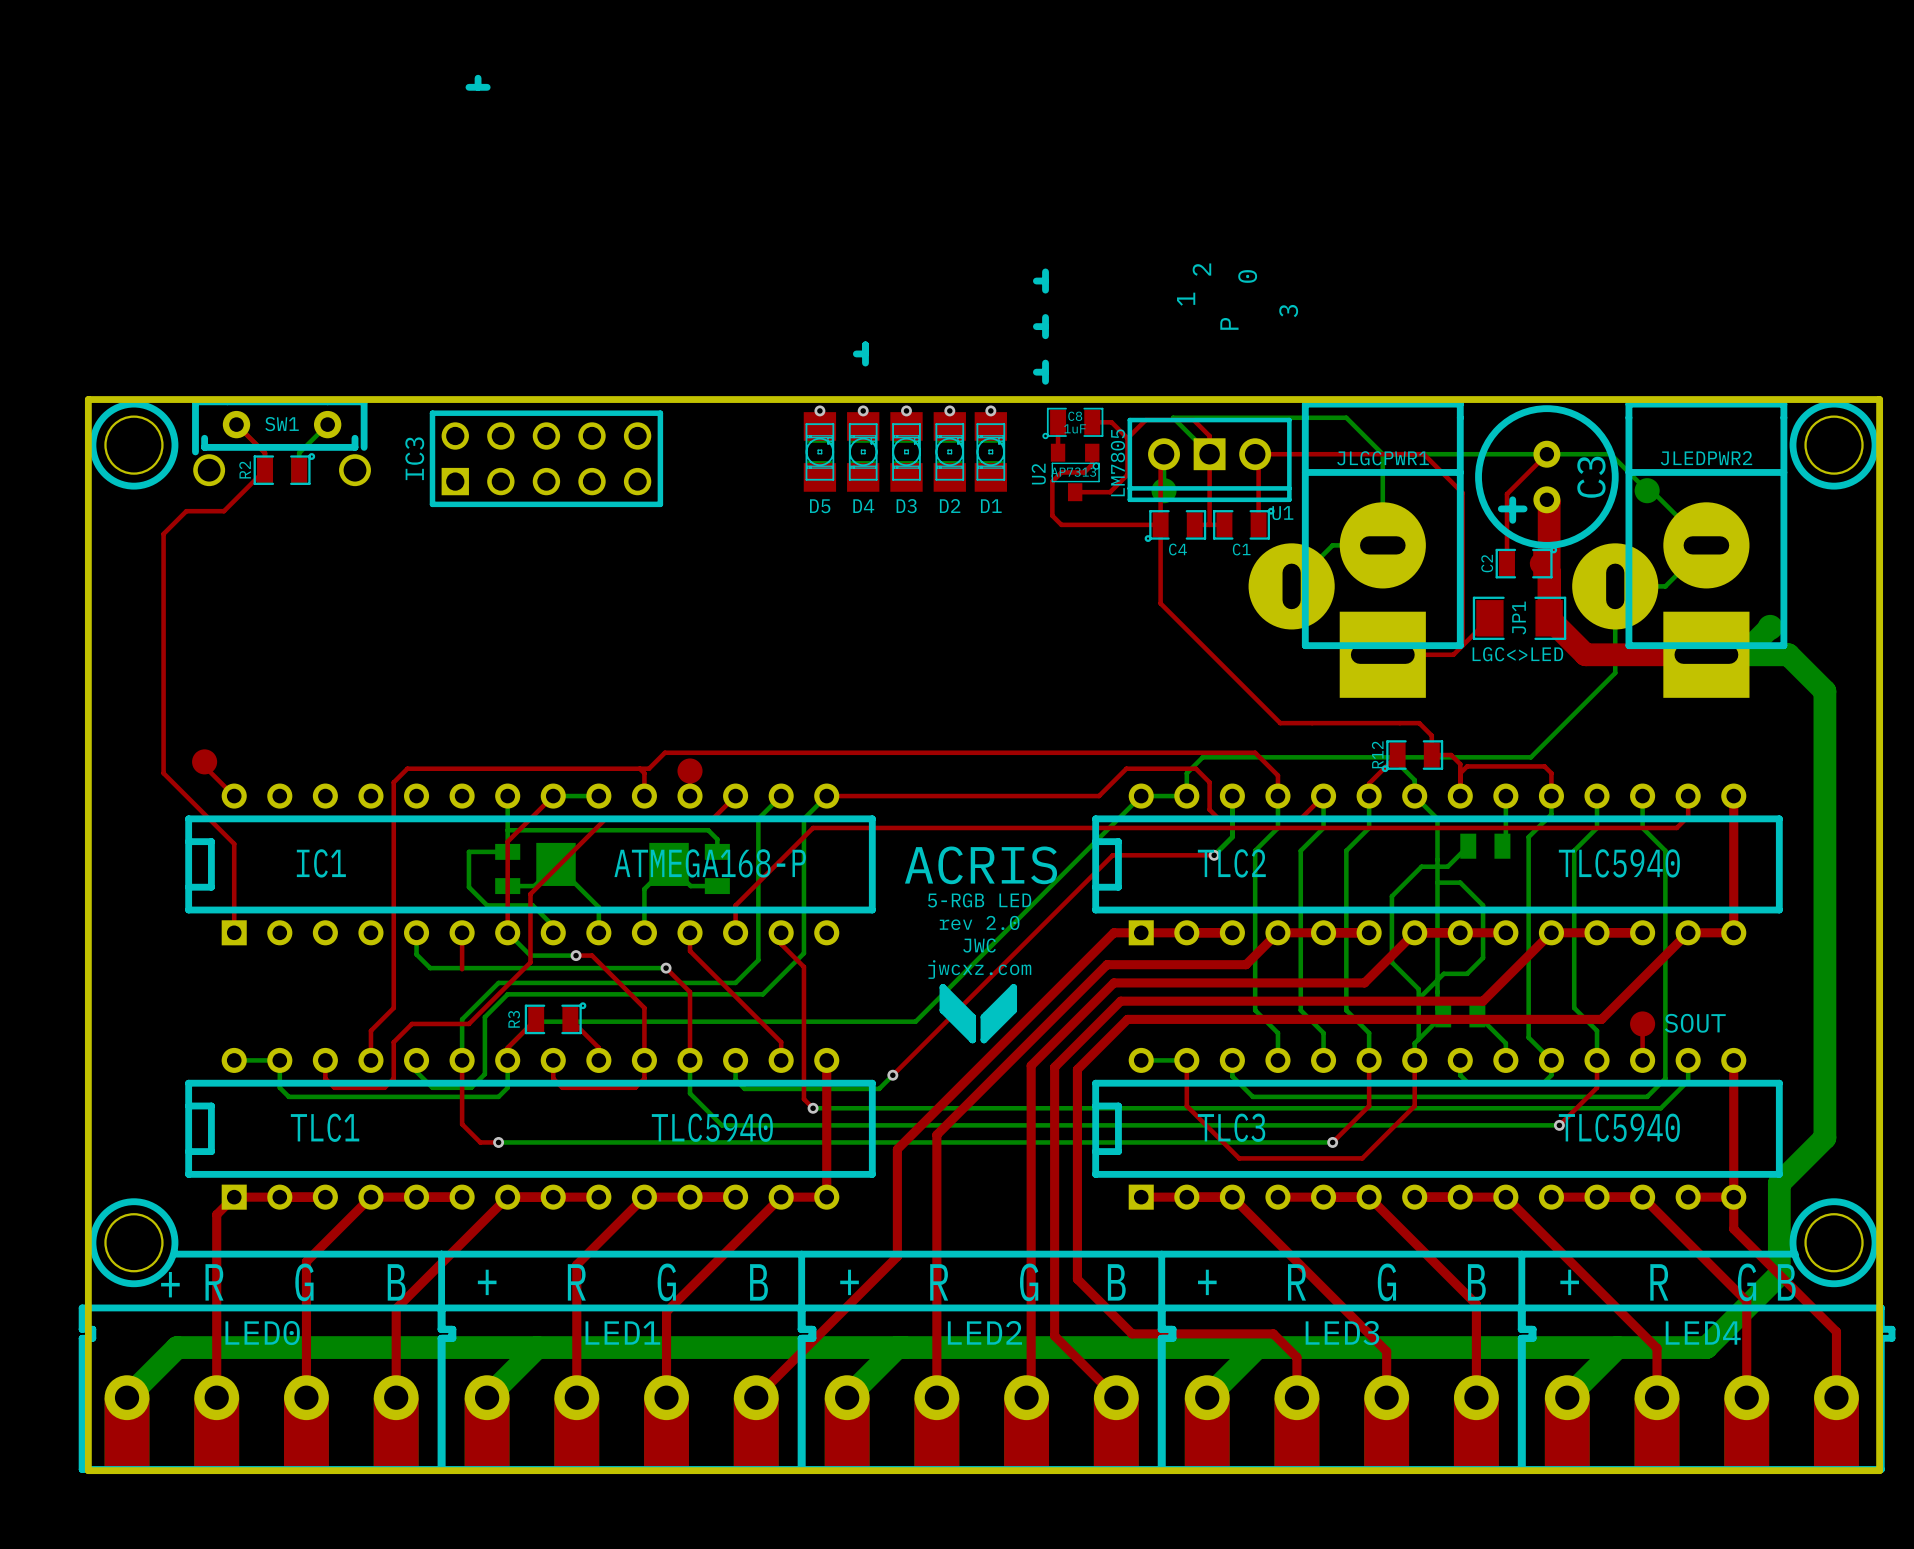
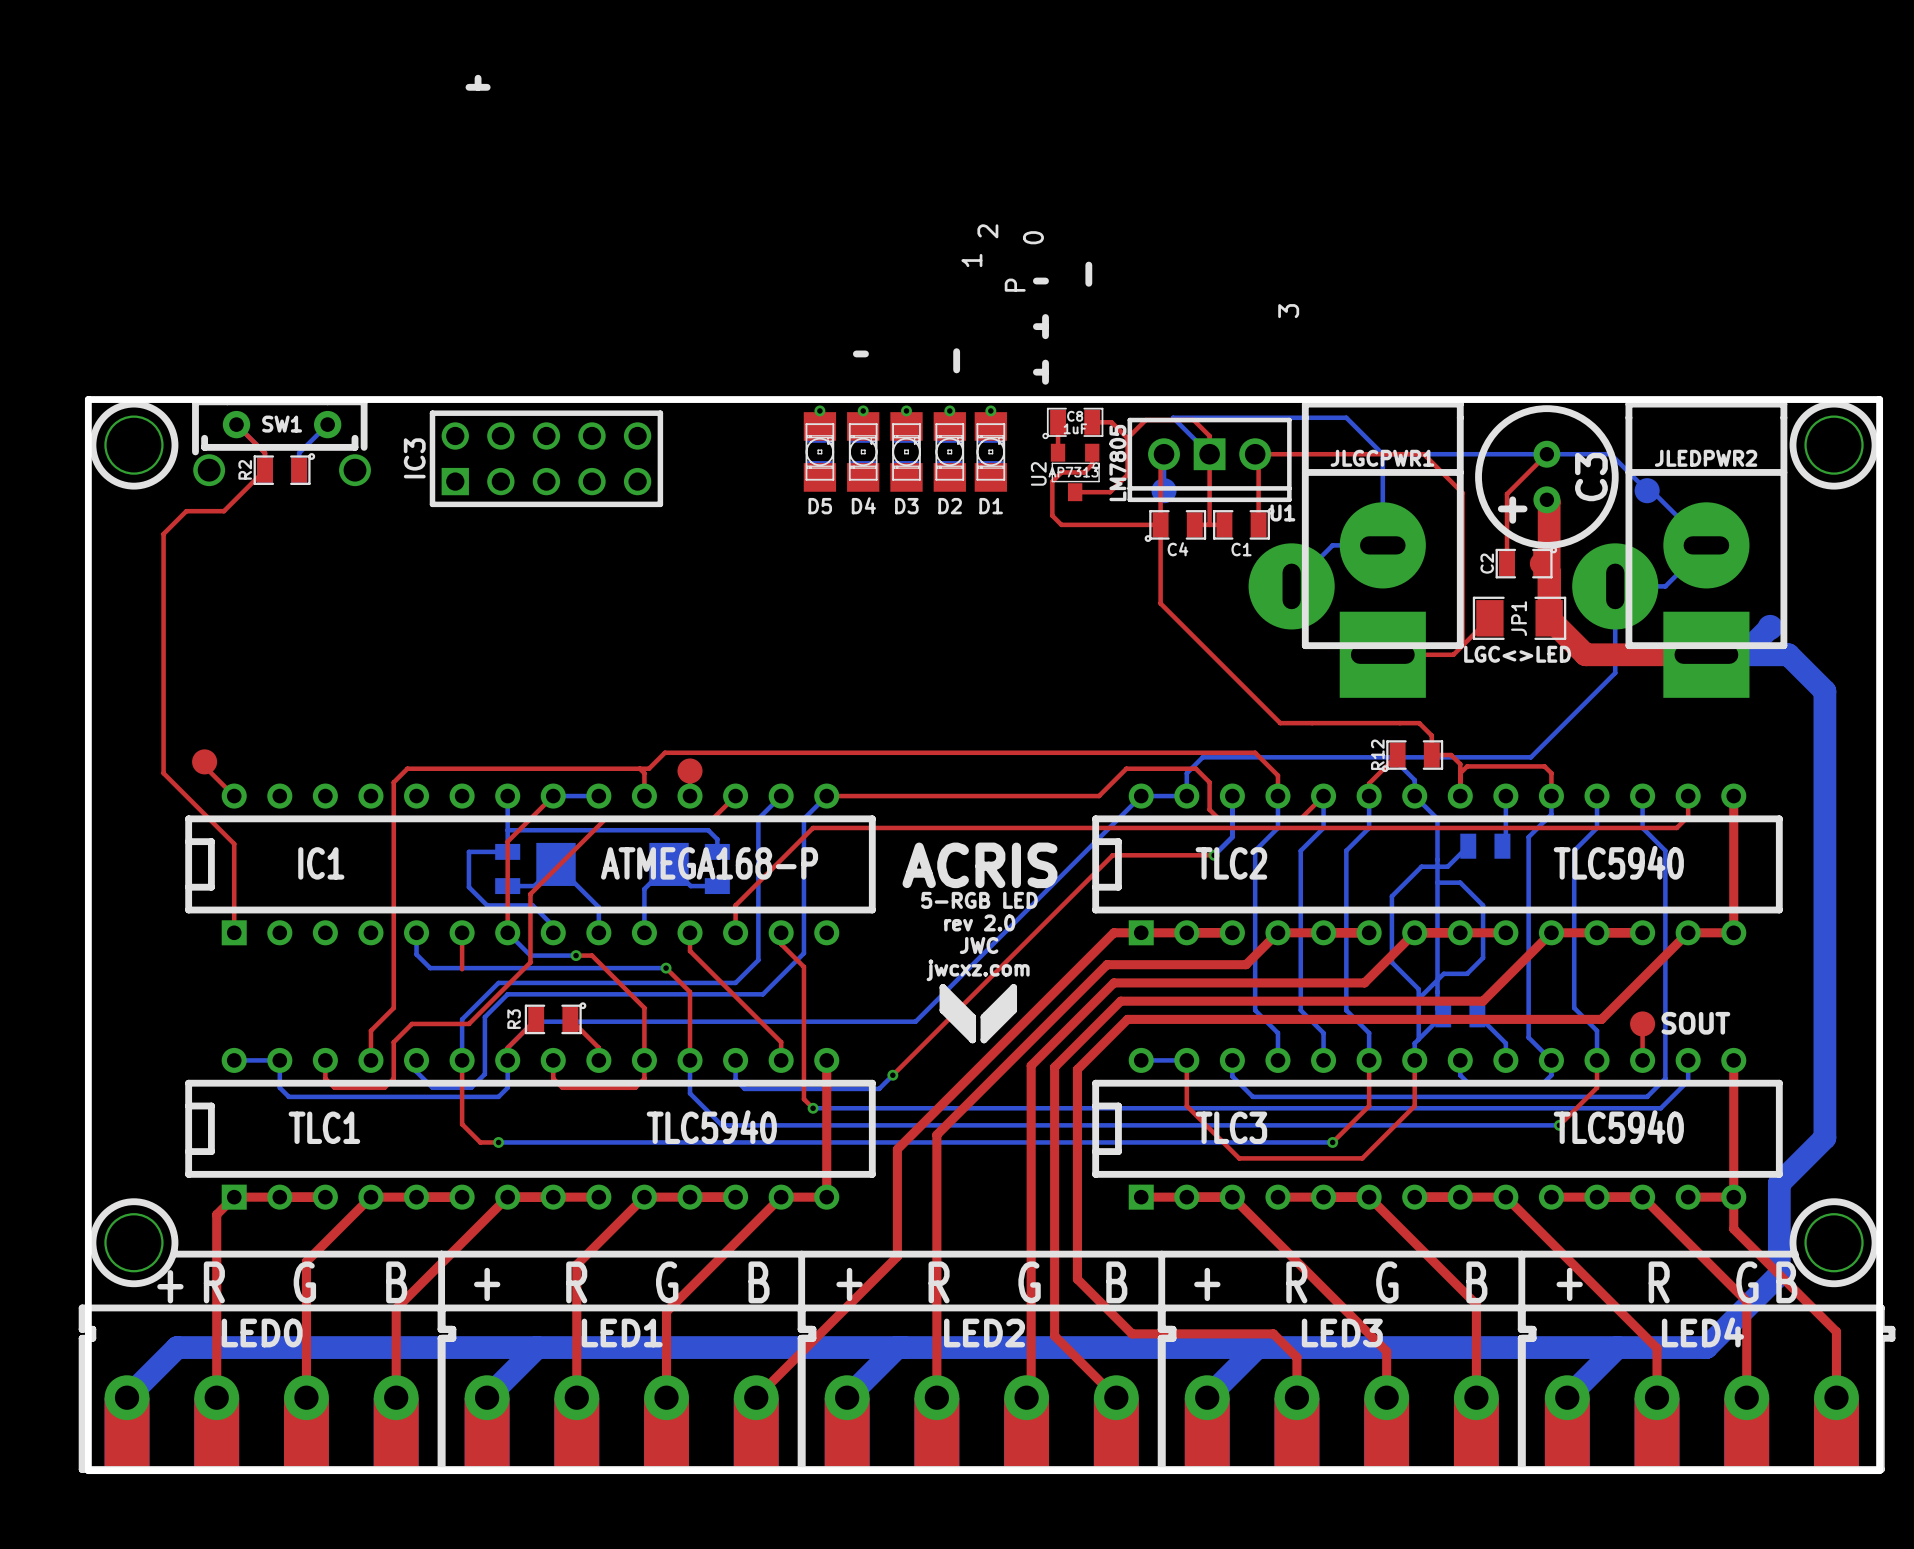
text position: 2 (1201, 269) -> 2 (987, 231)
line: (1045, 271) (1045, 290) -> (1088, 265) (1088, 283)
text position: 0 (1247, 276) -> 0 (1033, 237)
text position: 1 (1186, 299) -> 1 (971, 260)
text position: P (1229, 323) -> P (1015, 285)
line: (865, 344) (865, 363) -> (956, 351) (956, 369)

